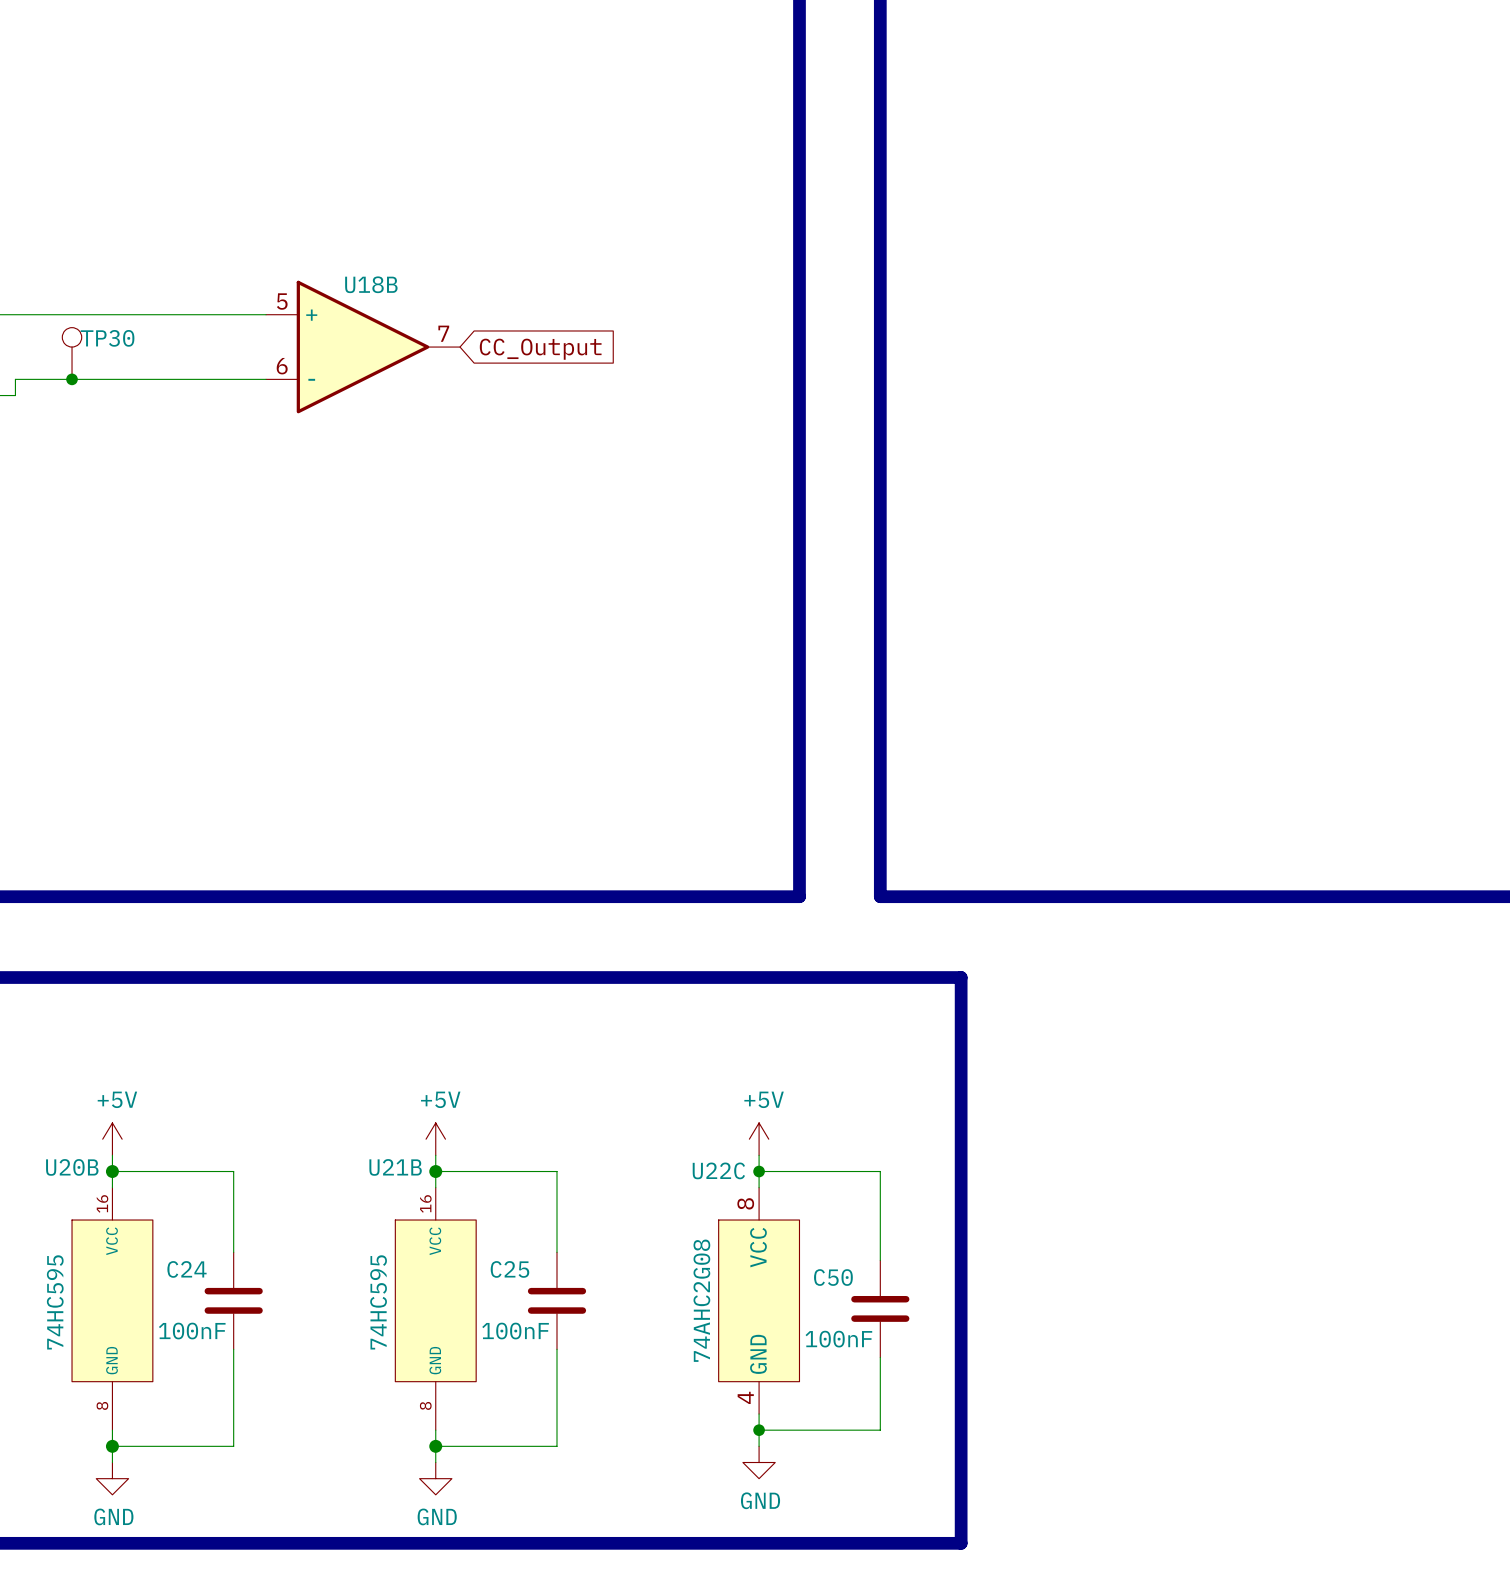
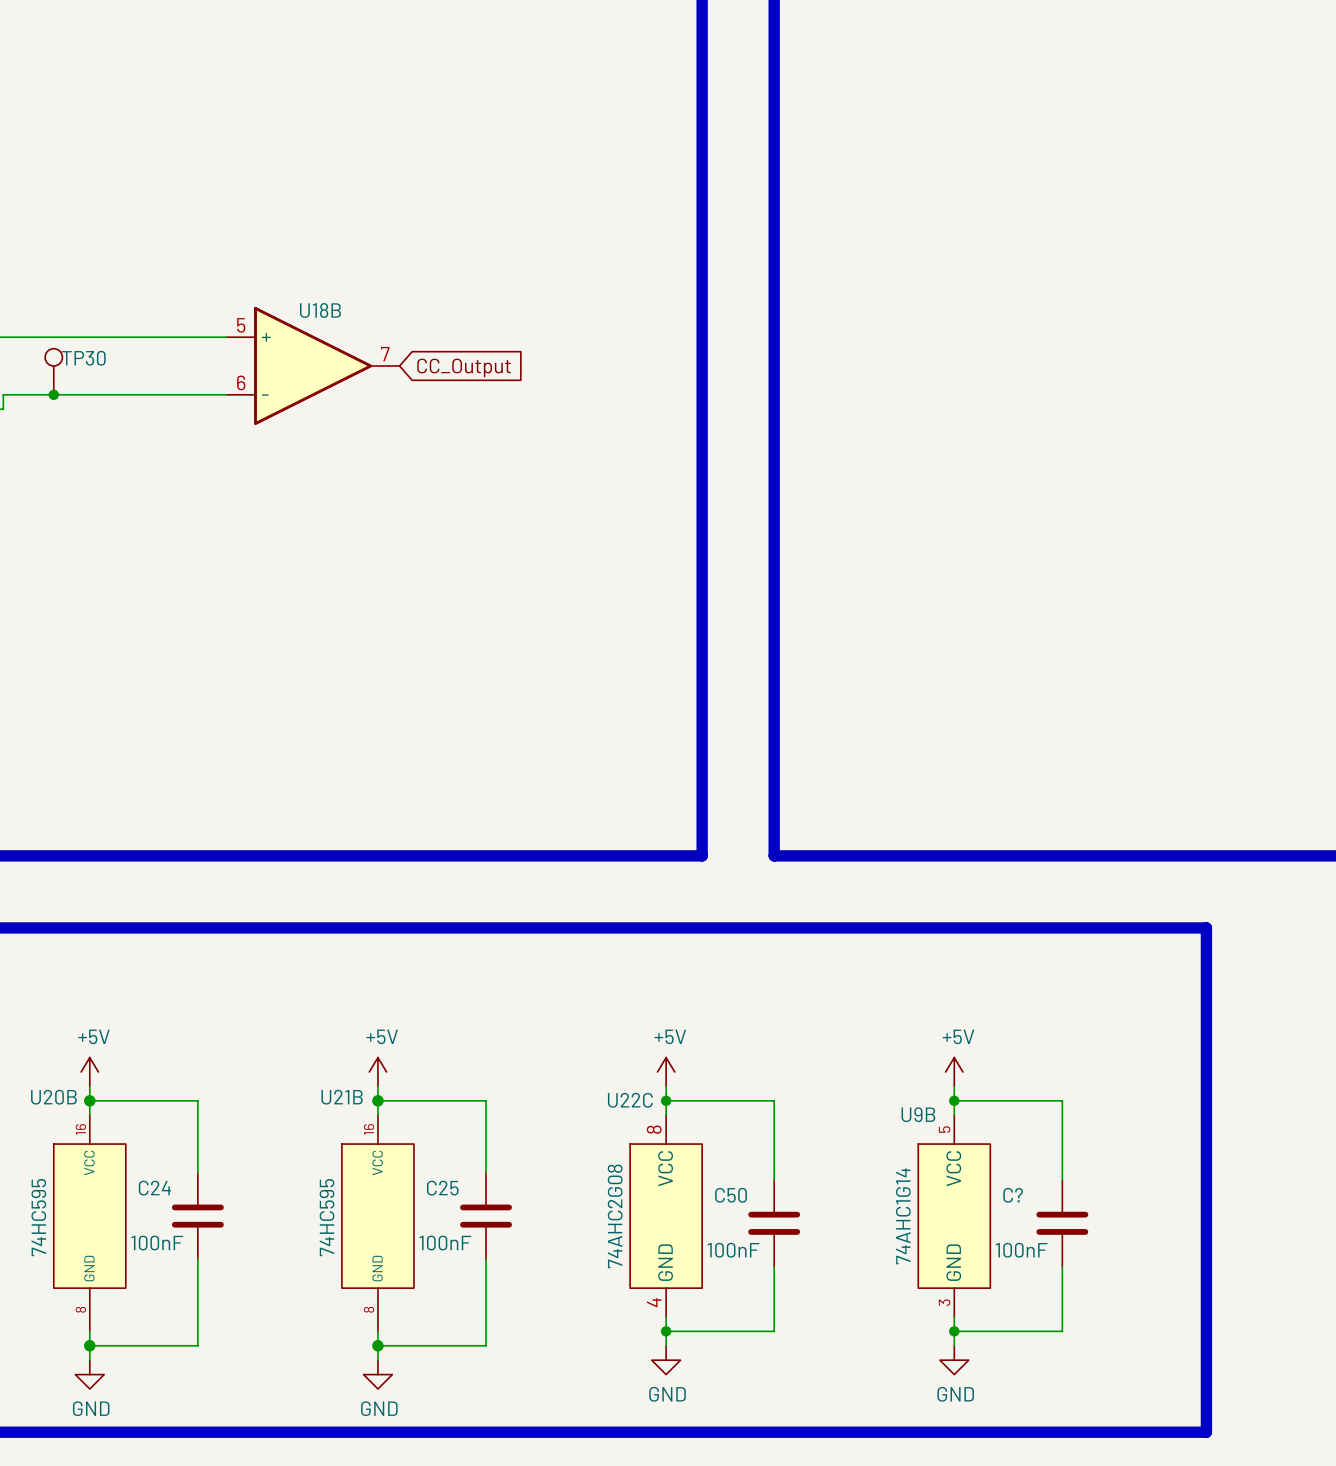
line: (961, 977) (961, 1543) -> (846, 927) (1206, 927) (1206, 1432) (846, 1432)
power symbol: none -> +5V (954, 1072)
wire: none -> (954, 1086) (954, 1115)
wire: none -> (954, 1100) (1062, 1100) (1062, 1180)
junction: none -> (954, 1100)
U9B: none -> 74AHC1G14 (954, 1216)
C?: none -> 100nF (1062, 1223)
wire: none -> (1062, 1266) (1062, 1331) (954, 1331)
wire: none -> (954, 1316) (954, 1345)
junction: none -> (954, 1331)
power symbol: none -> GND (954, 1360)

